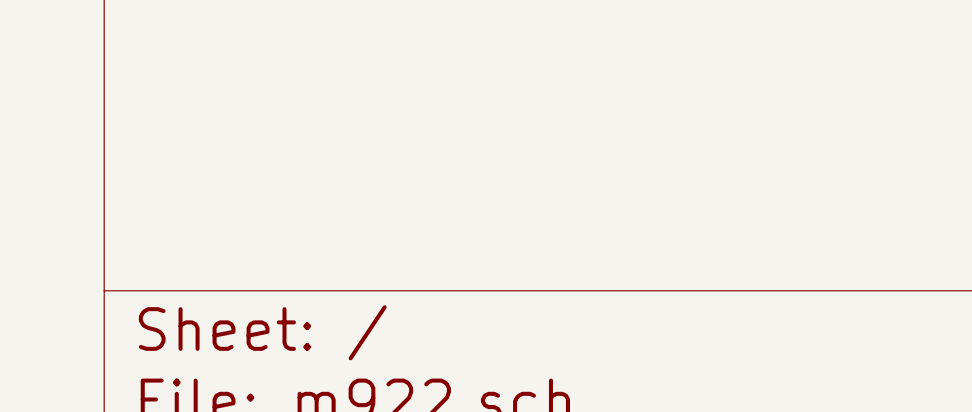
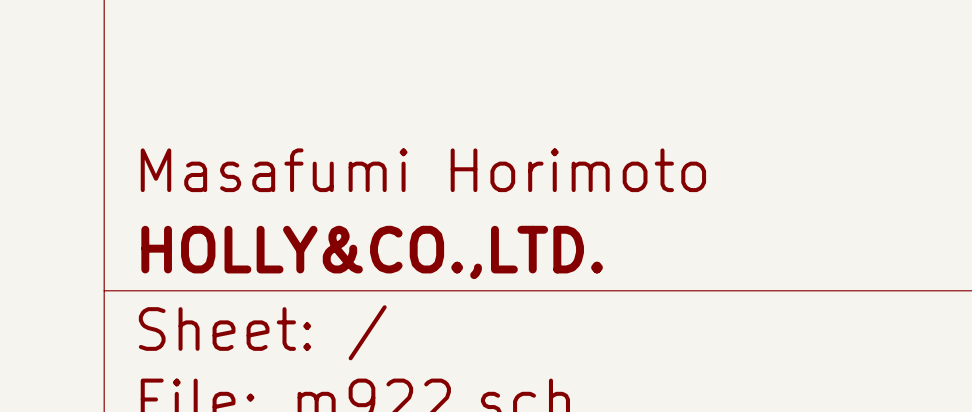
title block: none -> Masafumi Horimoto (423, 170)
title block: none -> HOLLY&CO.,LTD. (372, 252)

